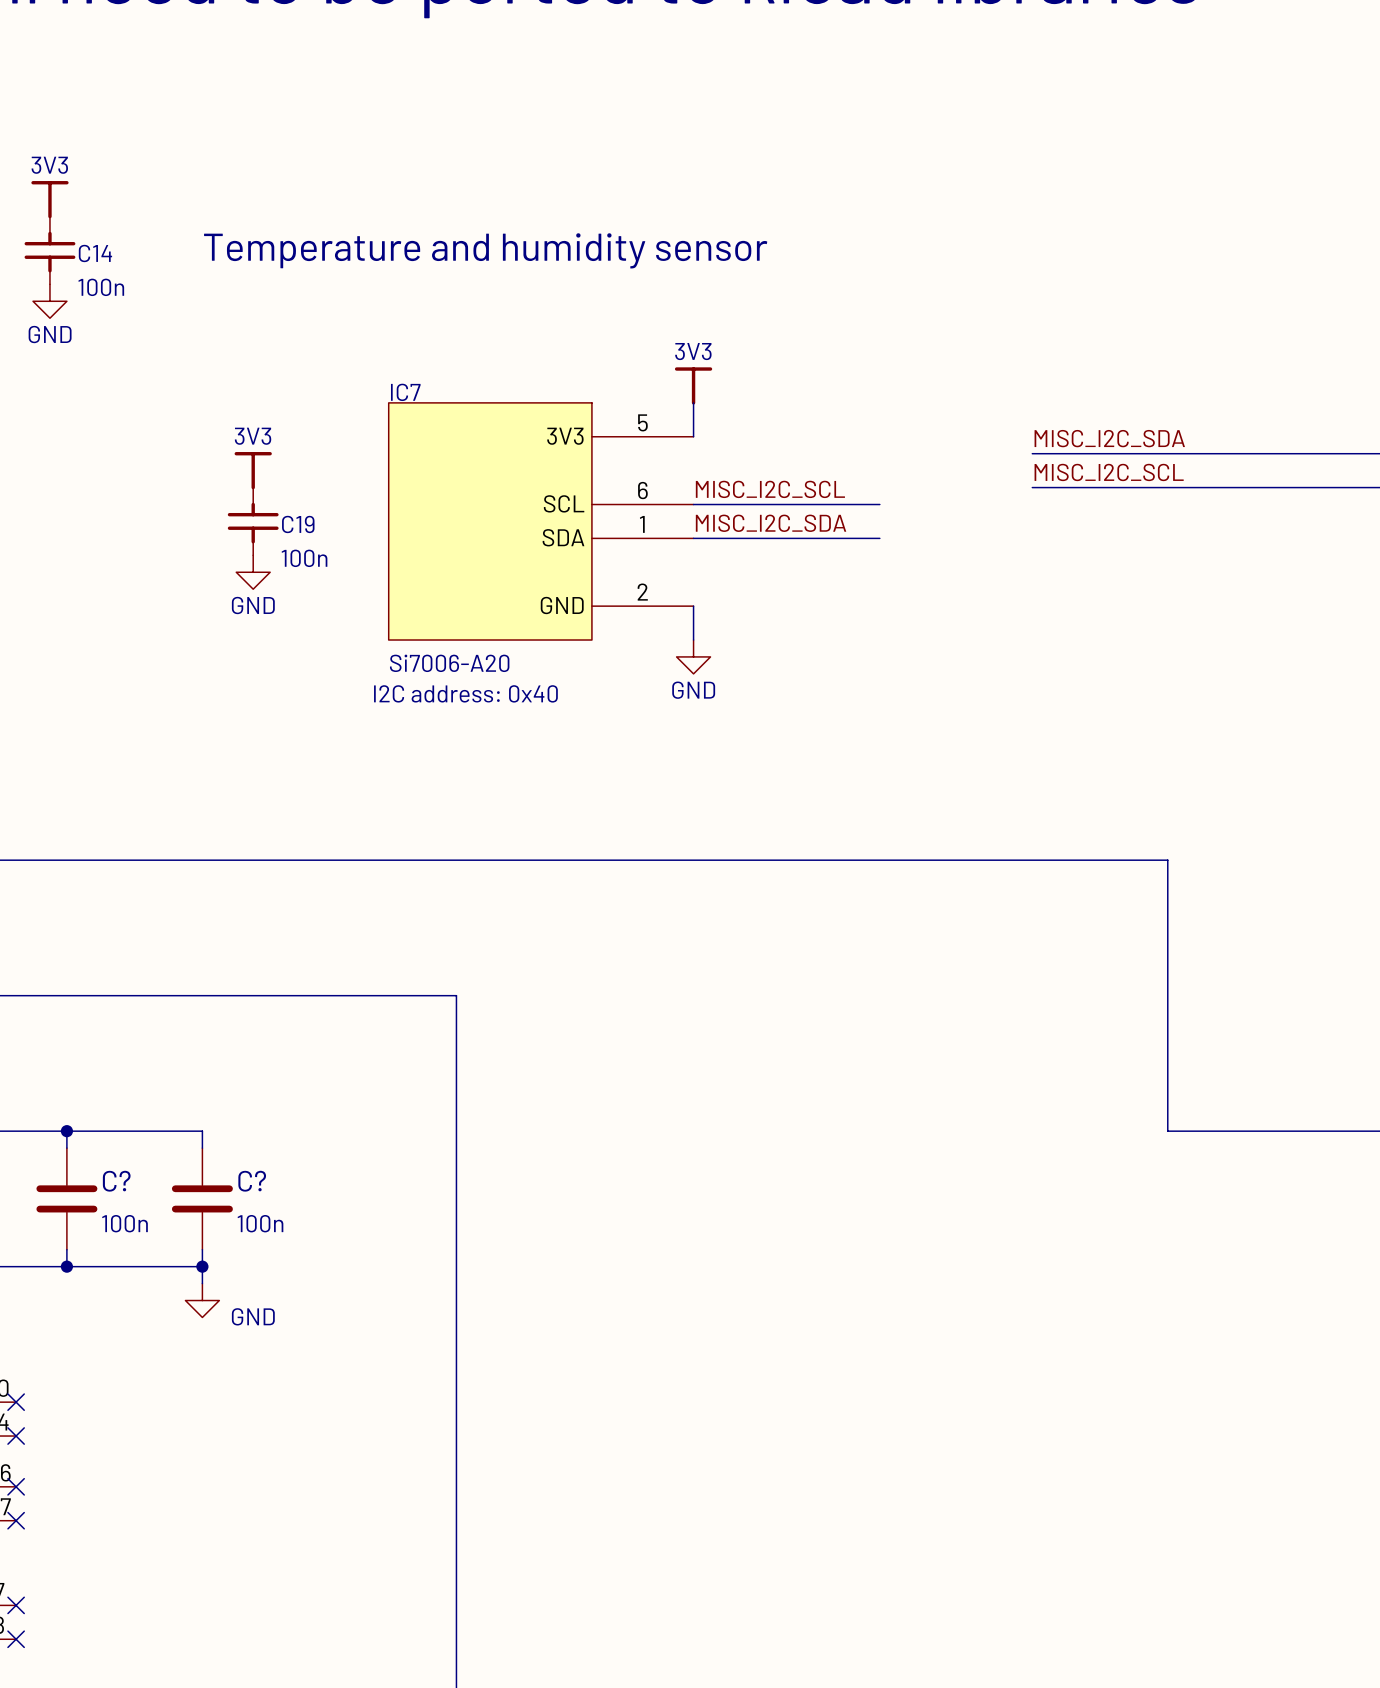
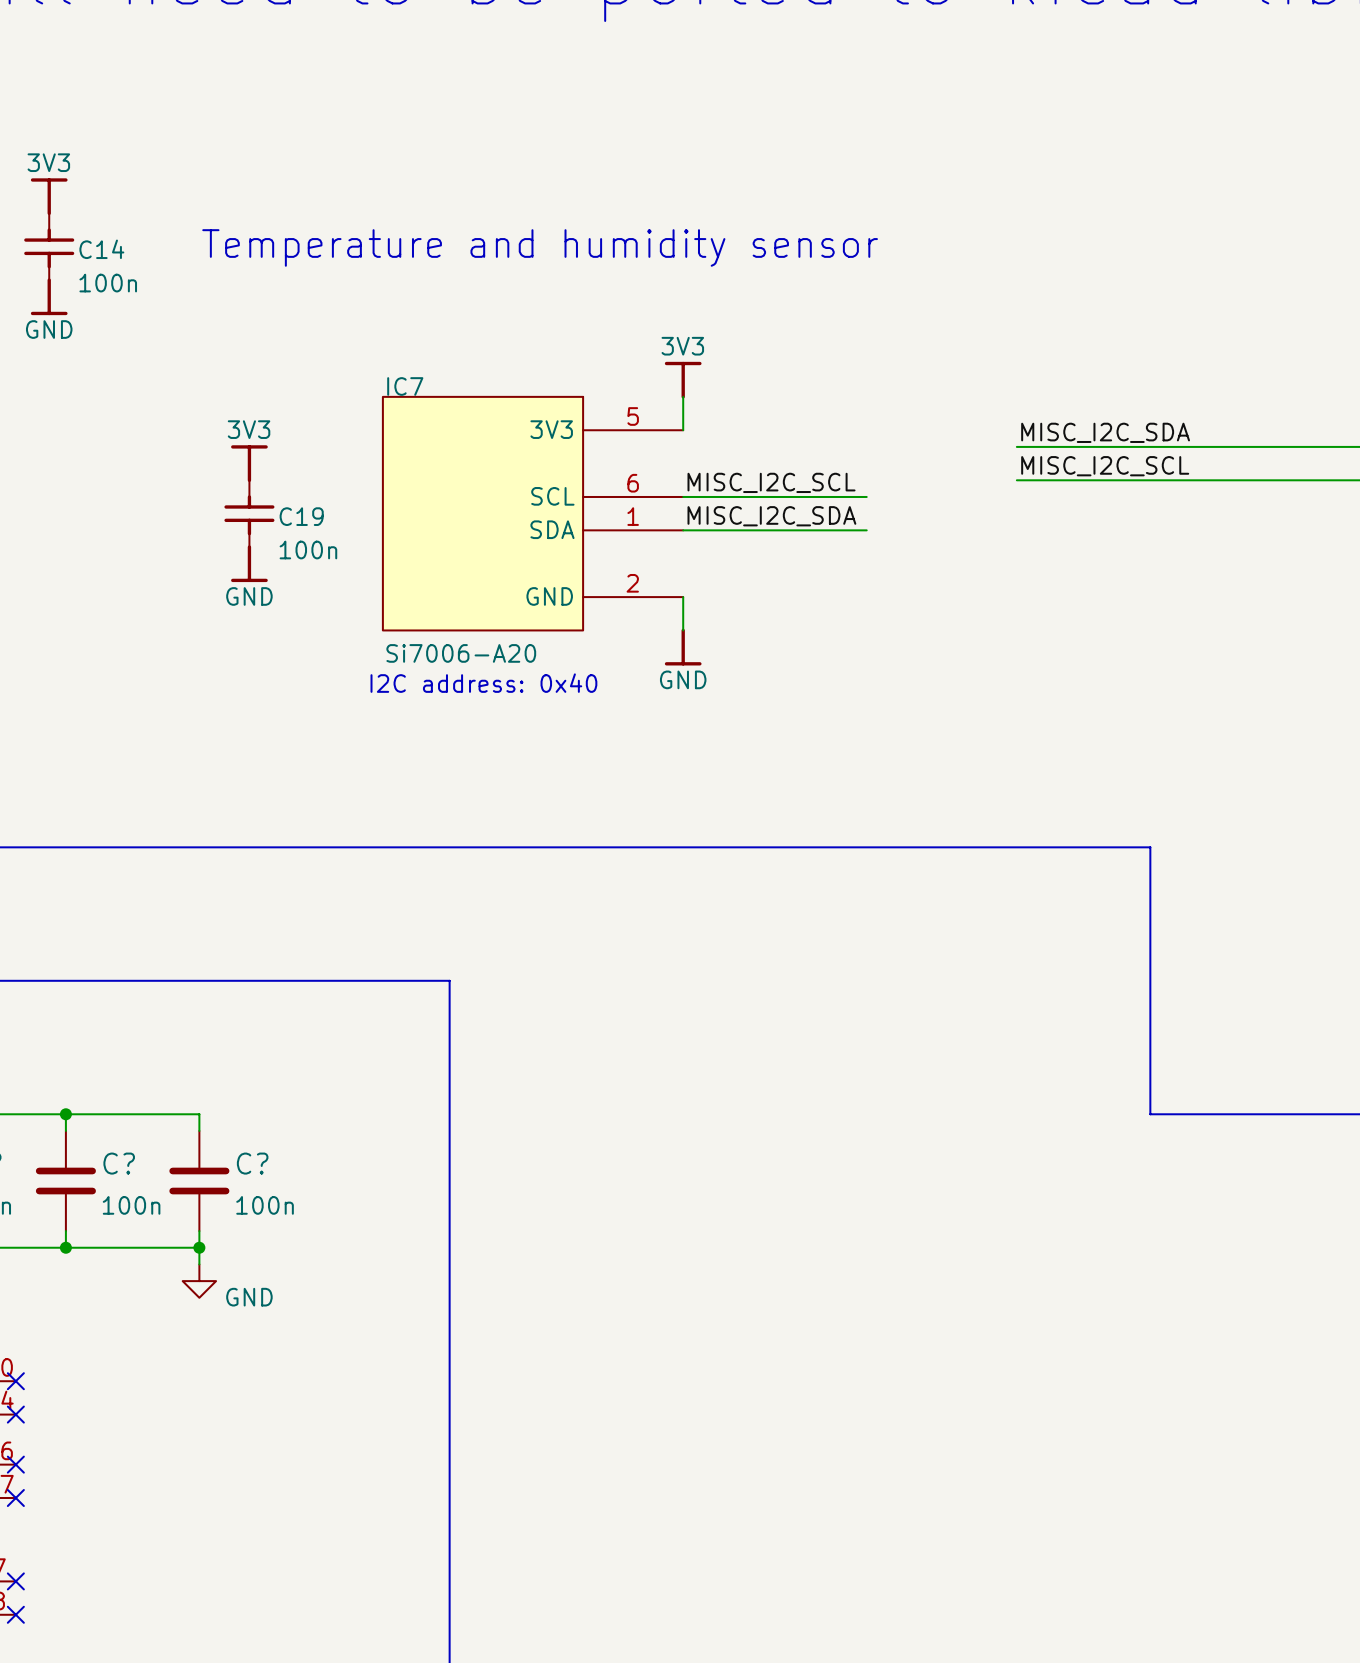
power symbol shape: [33, 284, 67, 319] -> [30, 278, 68, 316]
power symbol shape: [236, 555, 271, 590] -> [231, 545, 268, 583]
power symbol shape: [676, 640, 711, 674] -> [664, 628, 702, 666]

